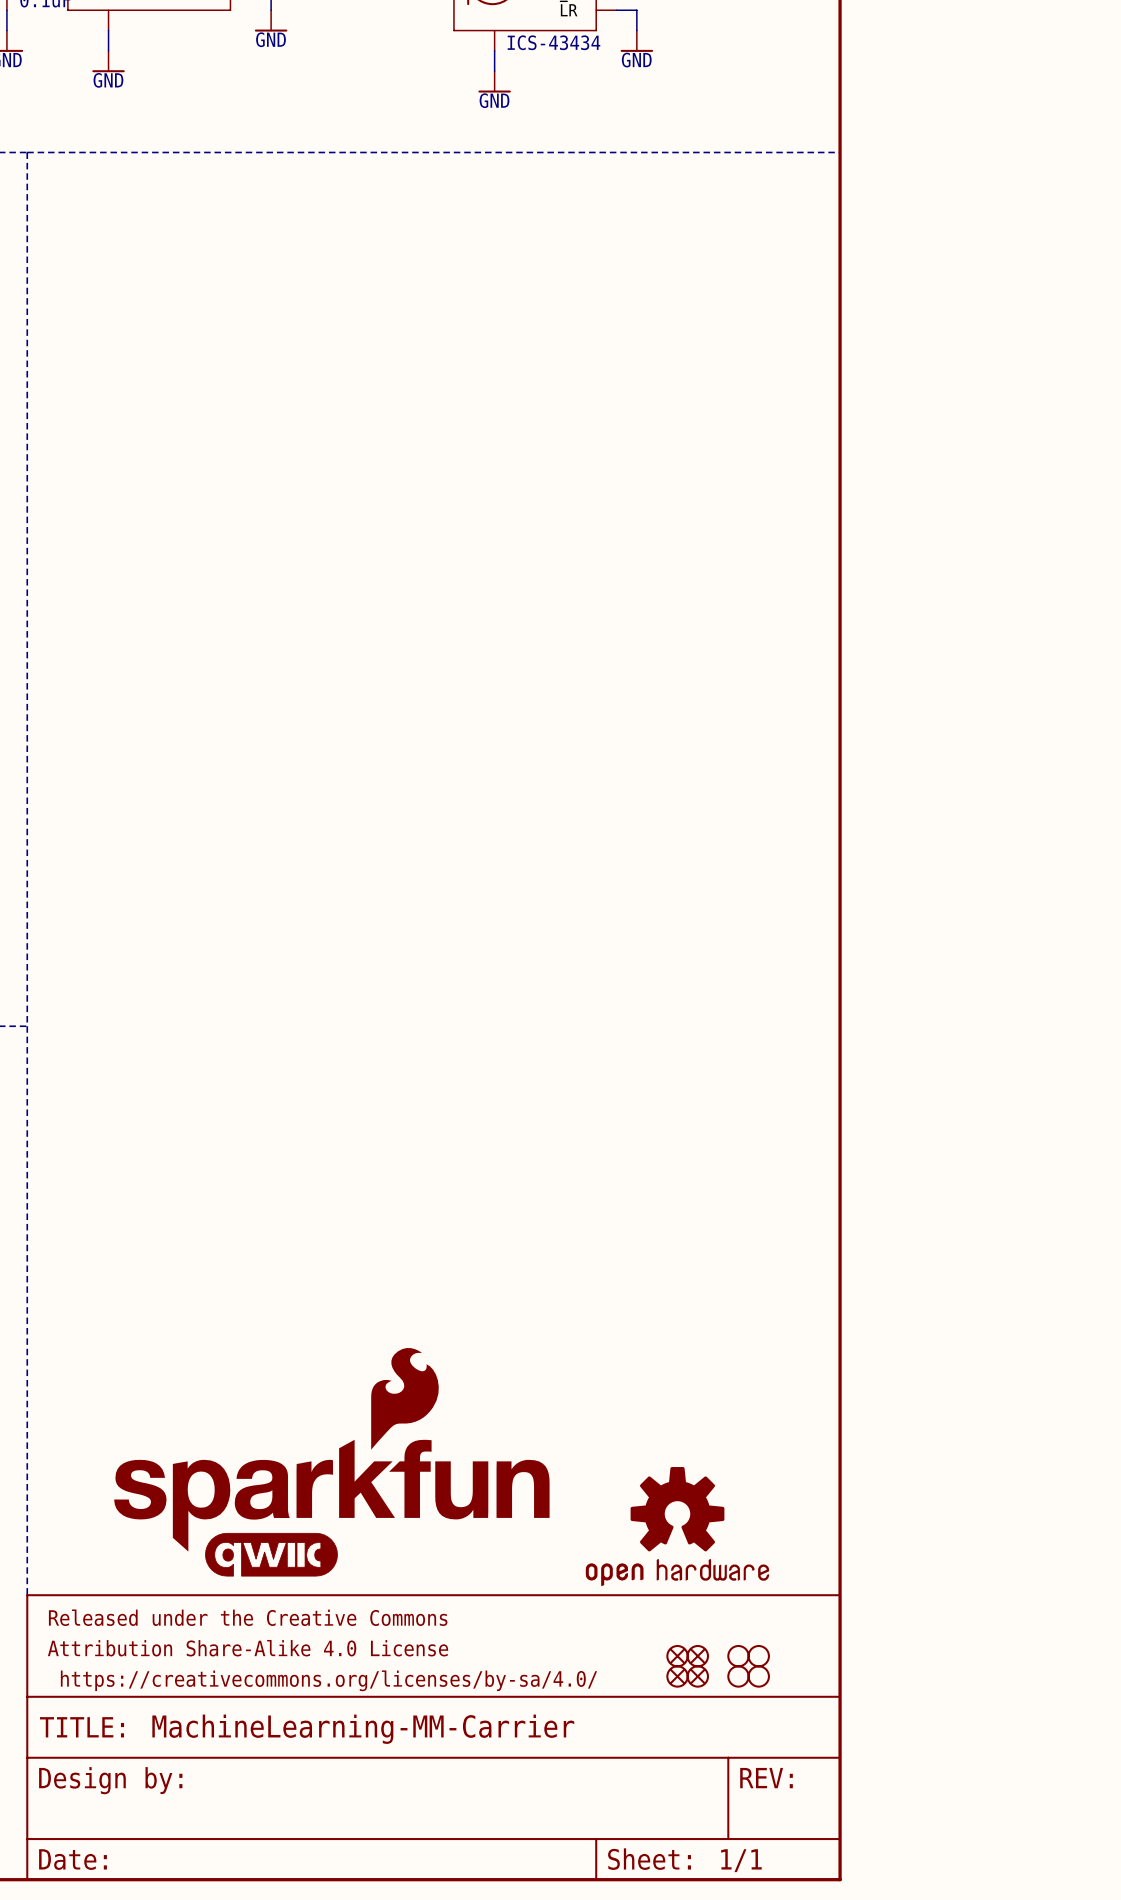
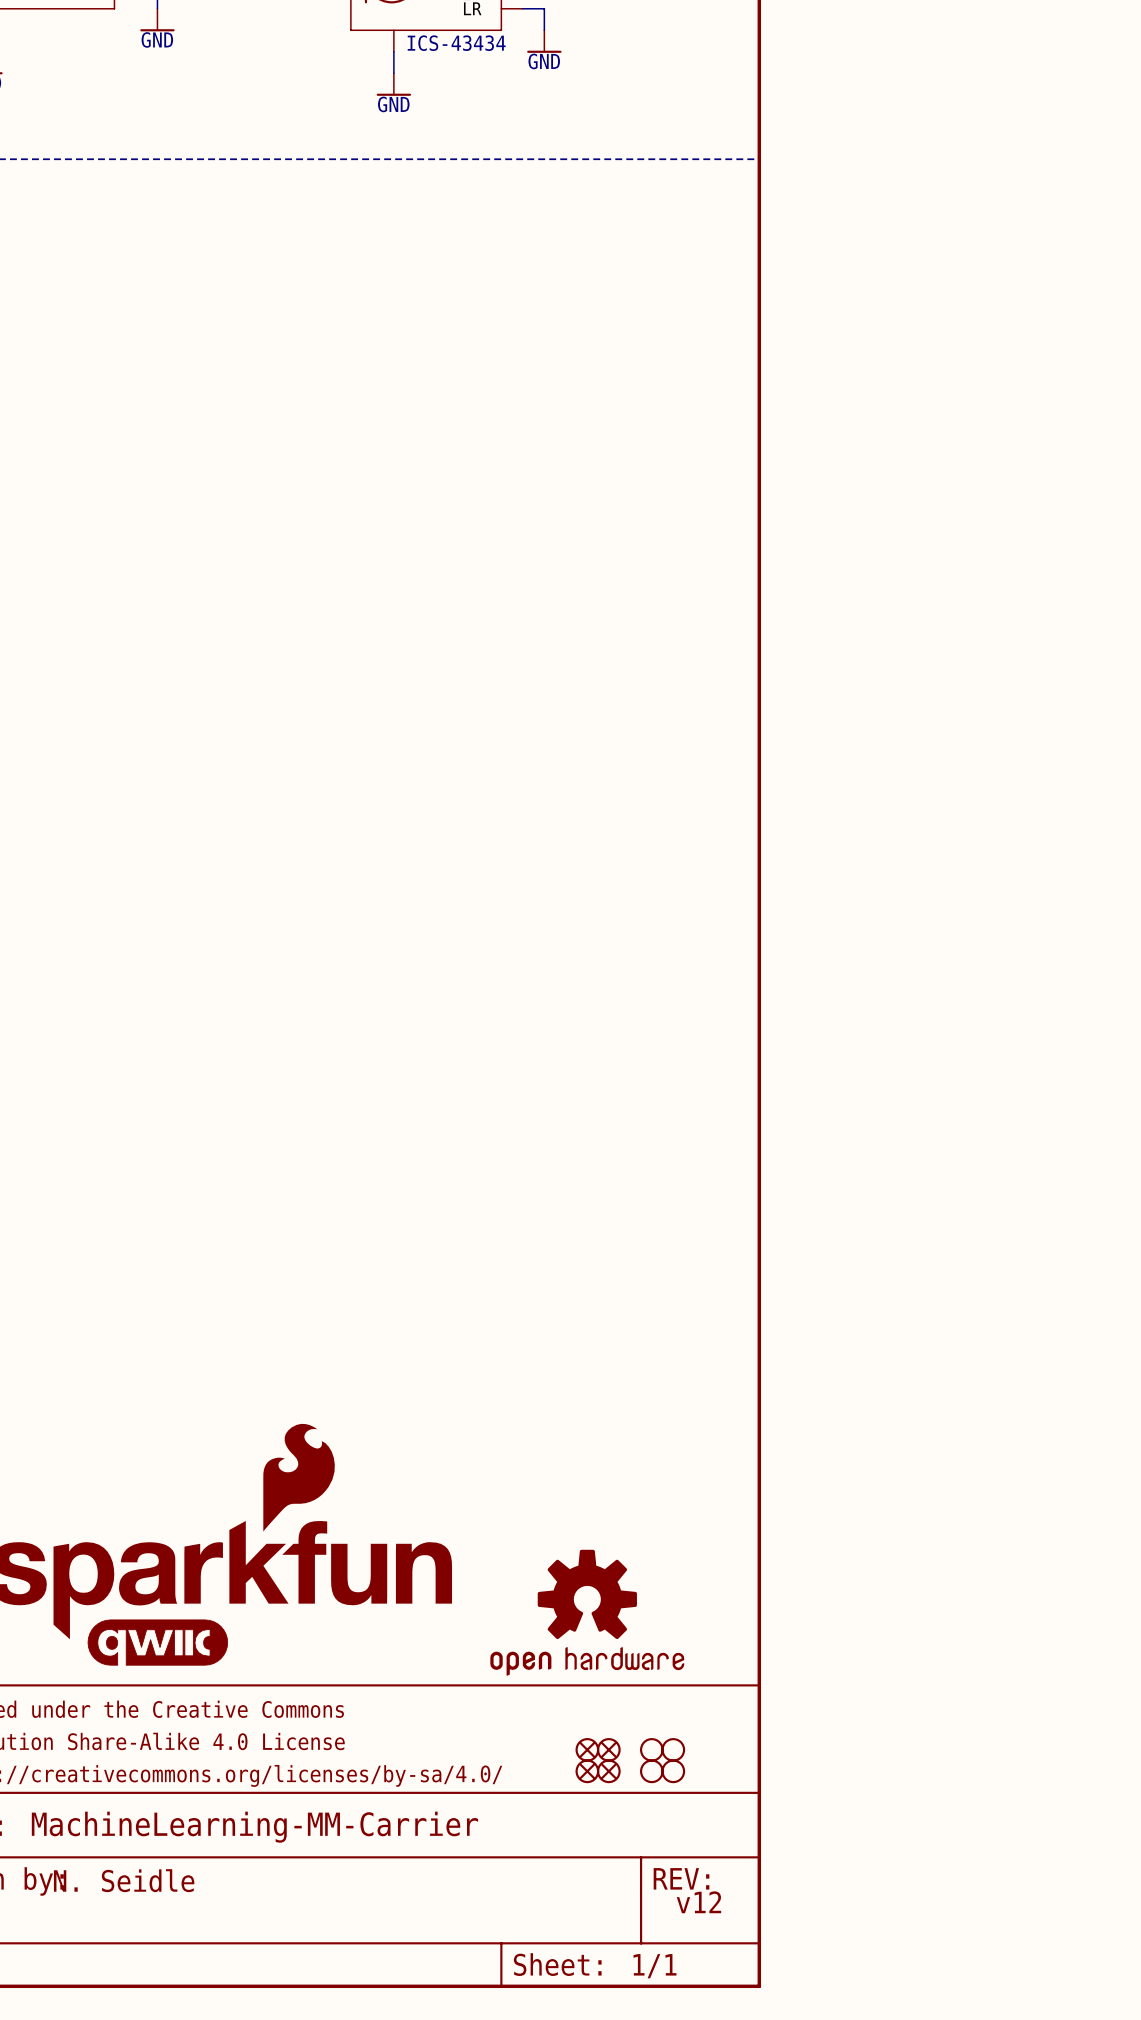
text: none -> N. Seidle (124, 1880)
text: none -> v12 (698, 1902)

